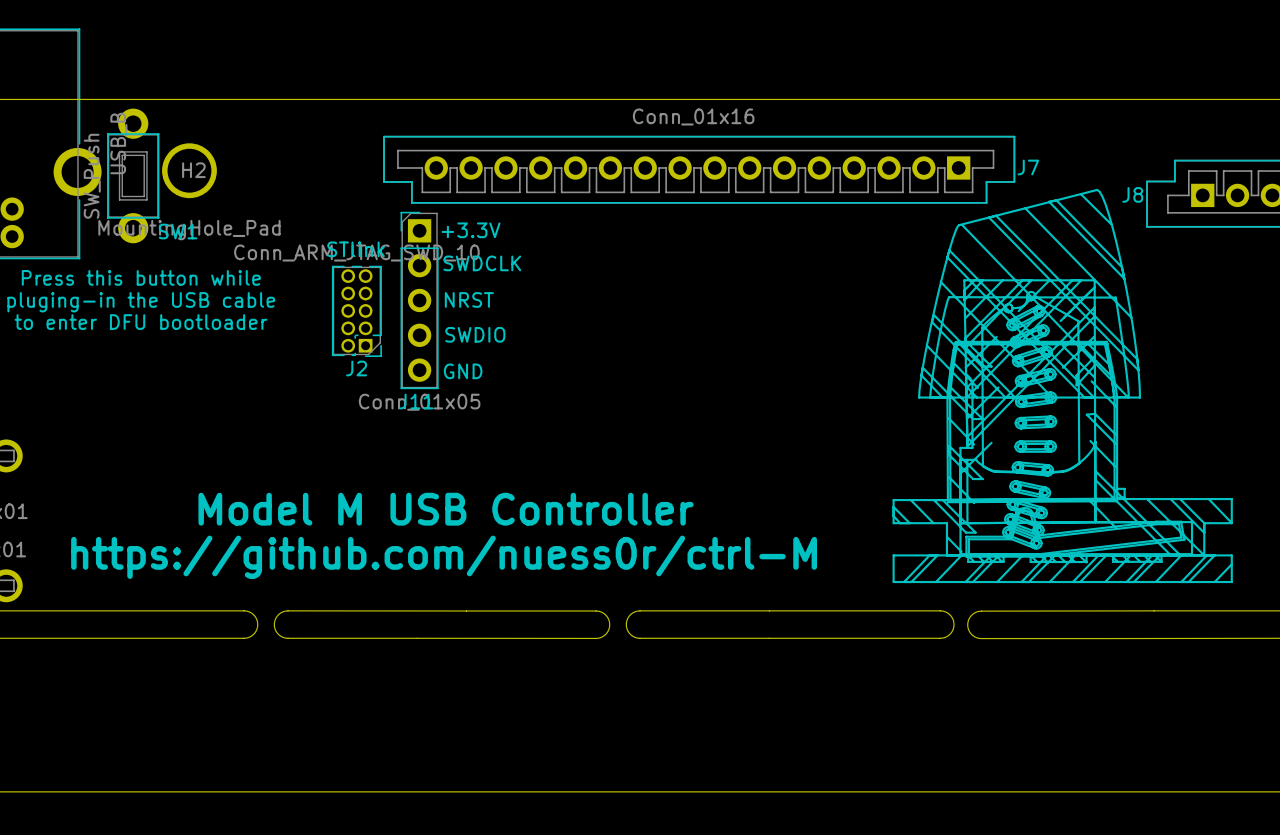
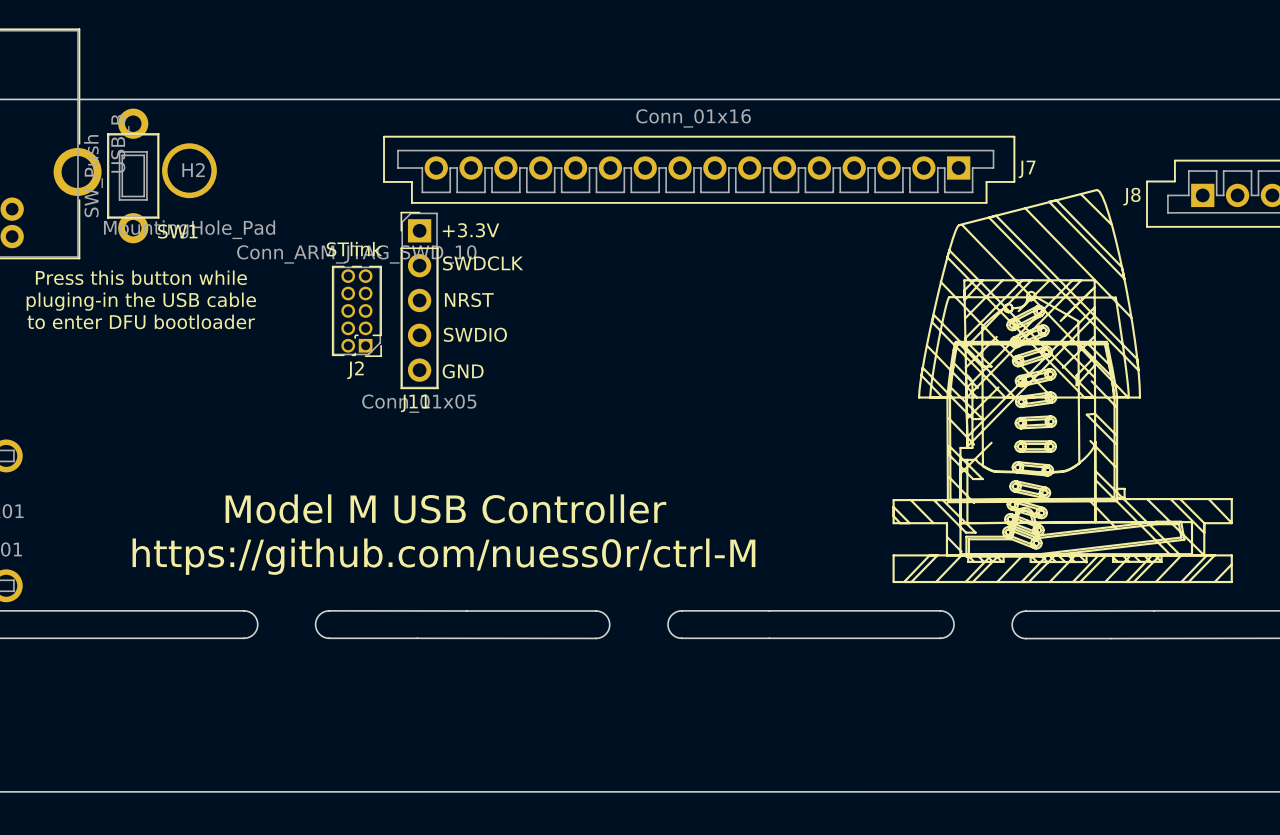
board edge: (681, 610) (636, 611) (629, 616) (626, 624) (629, 632) (636, 637) (681, 638) -> (681, 610) (672, 614) (668, 624) (672, 634) (681, 638)
board edge: (1154, 610) (981, 611) (973, 613) (968, 621) (969, 631) (977, 638) (1025, 638) -> (1154, 610) (1022, 611) (1014, 616) (1012, 626) (1016, 634) (1025, 638)
board edge: (466, 611) (288, 610) (279, 613) (274, 621) (276, 631) (284, 637) (329, 638) -> (466, 611) (327, 610) (319, 614) (315, 624) (319, 634) (329, 638)

